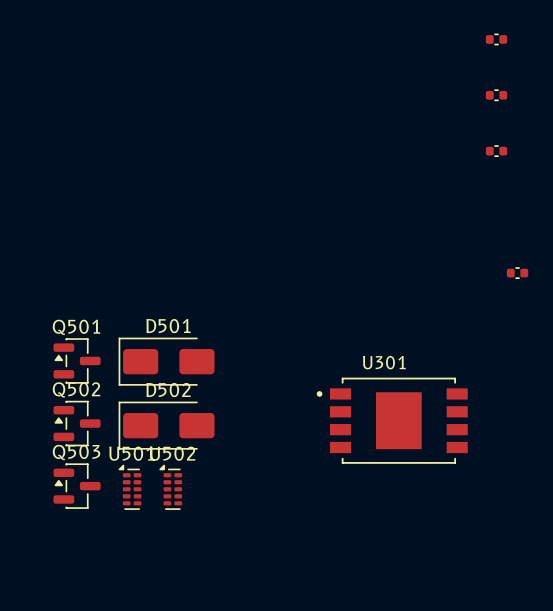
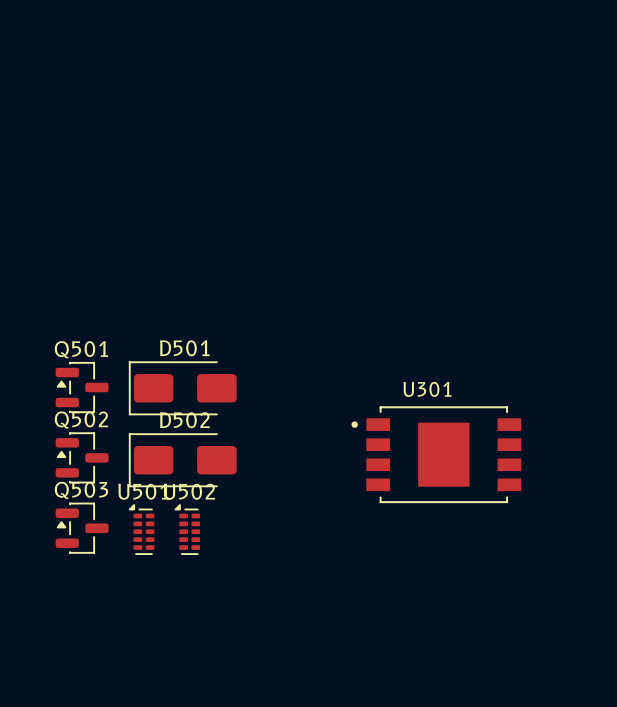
part: (496, 39) -> none
part: (496, 95) -> none
part: (496, 151) -> none
part: (517, 273) -> none

